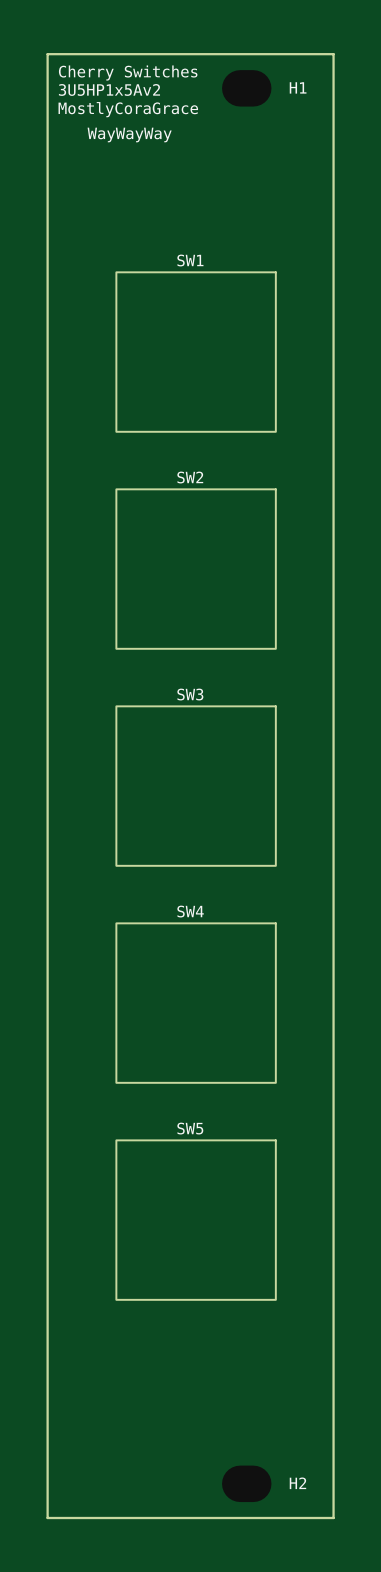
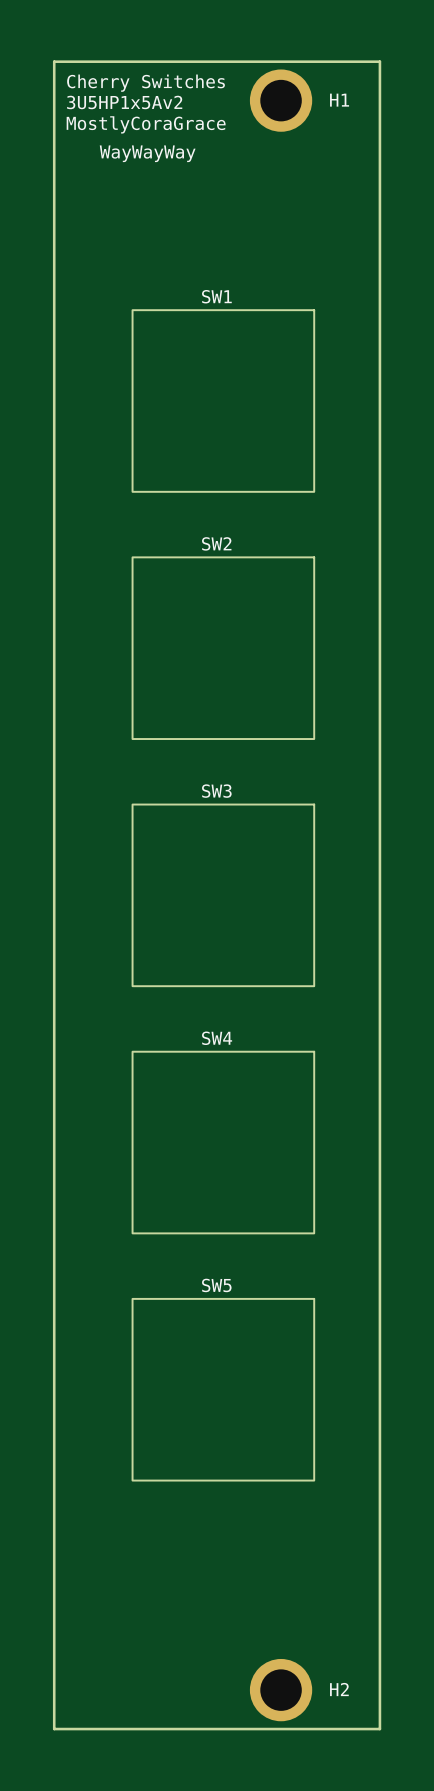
H1 footprint: [222, 70, 272, 107] -> [249, 69, 313, 132]
H2 footprint: [222, 1465, 272, 1503] -> [249, 1658, 313, 1722]

